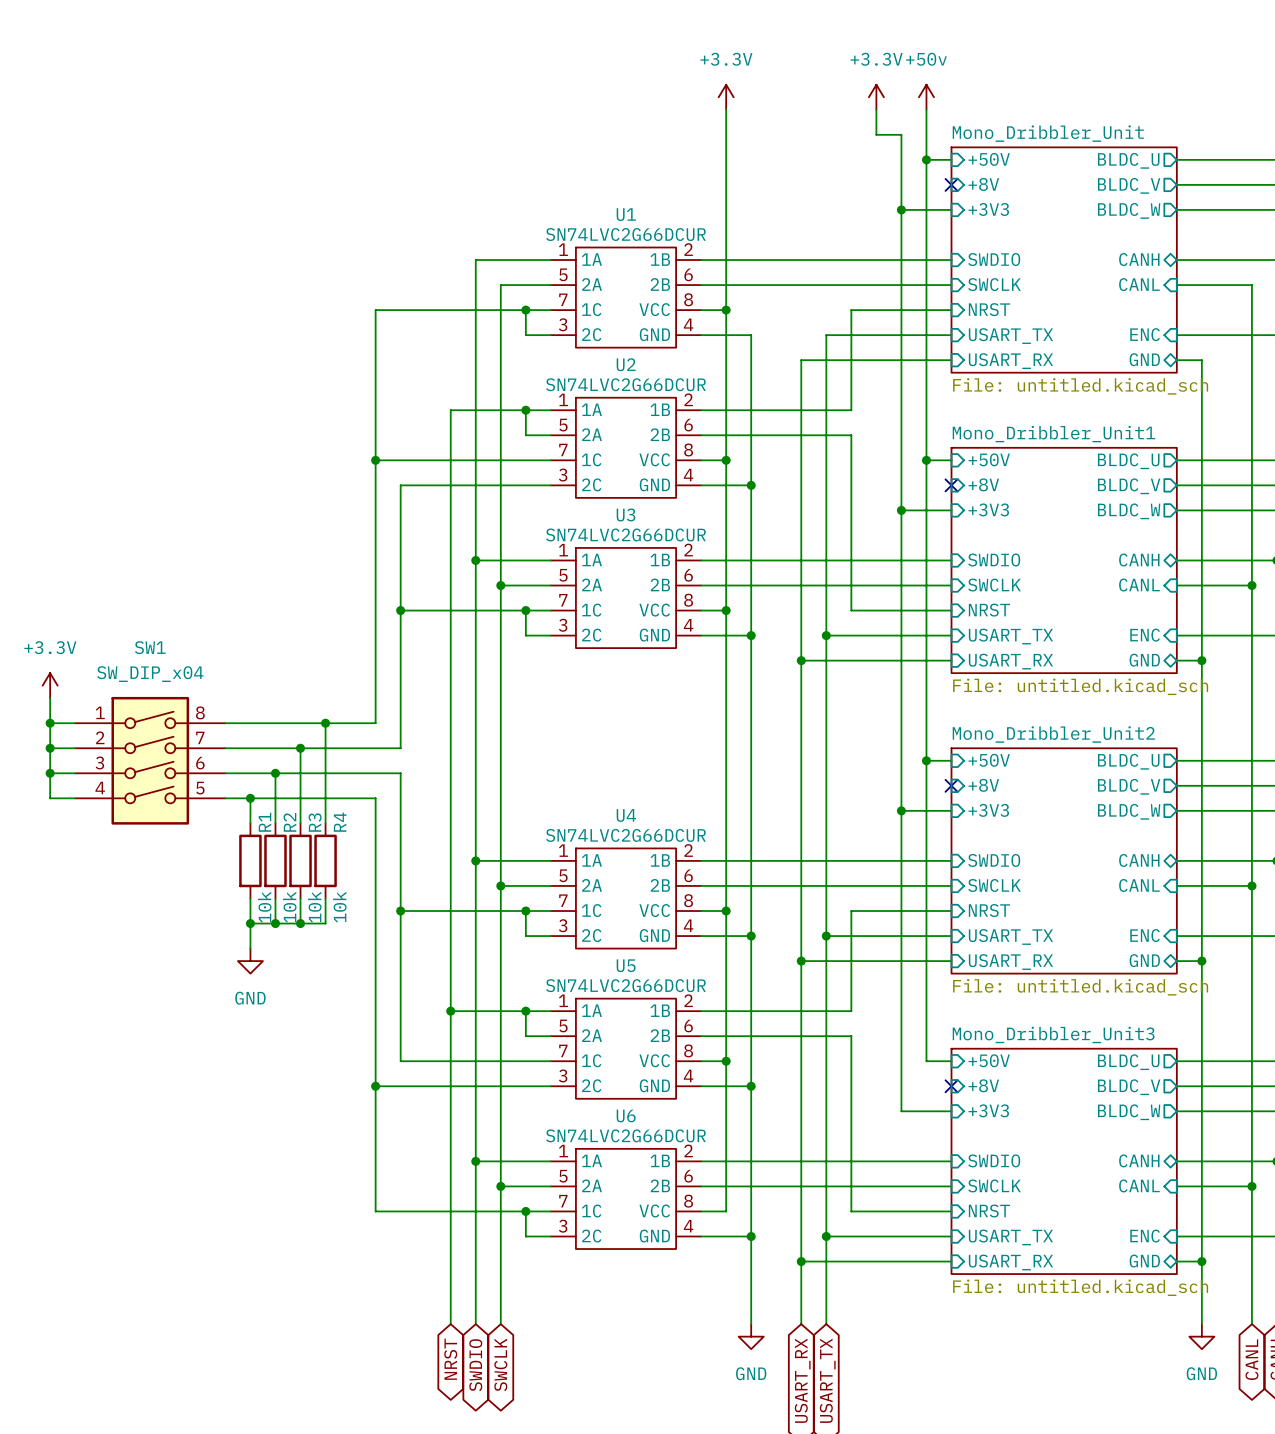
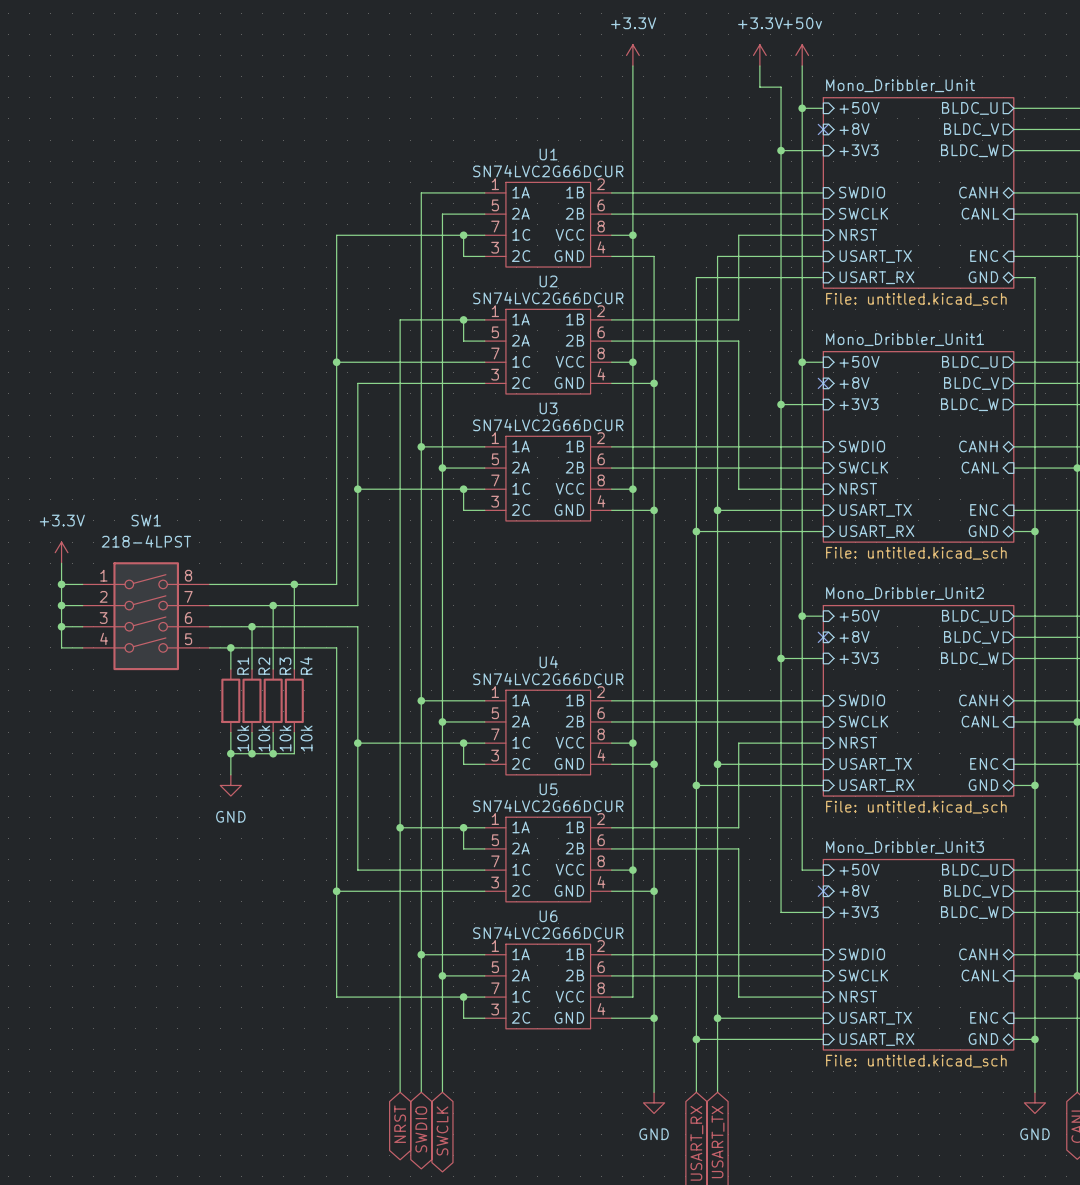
SW1 value: SW_DIP_x04 (150, 674) -> 218-4LPST (146, 541)

